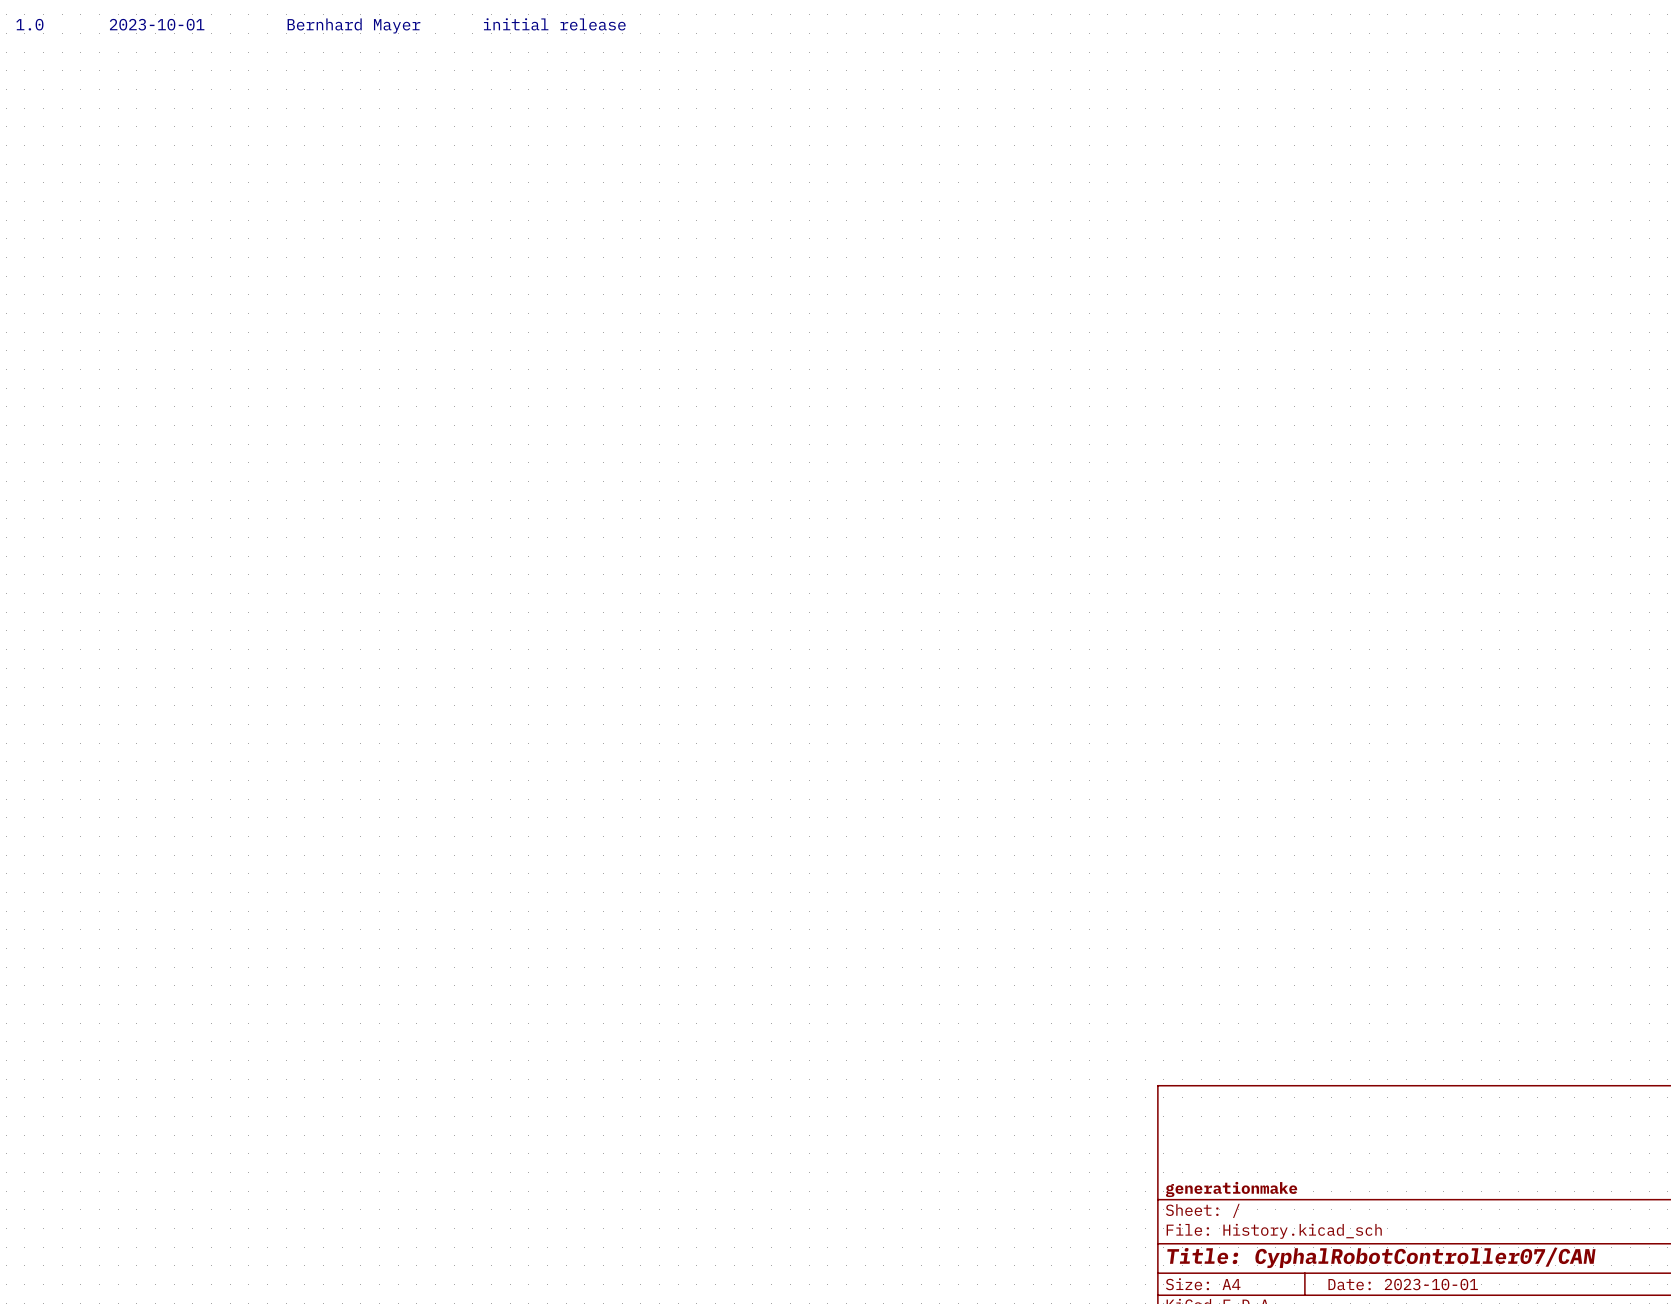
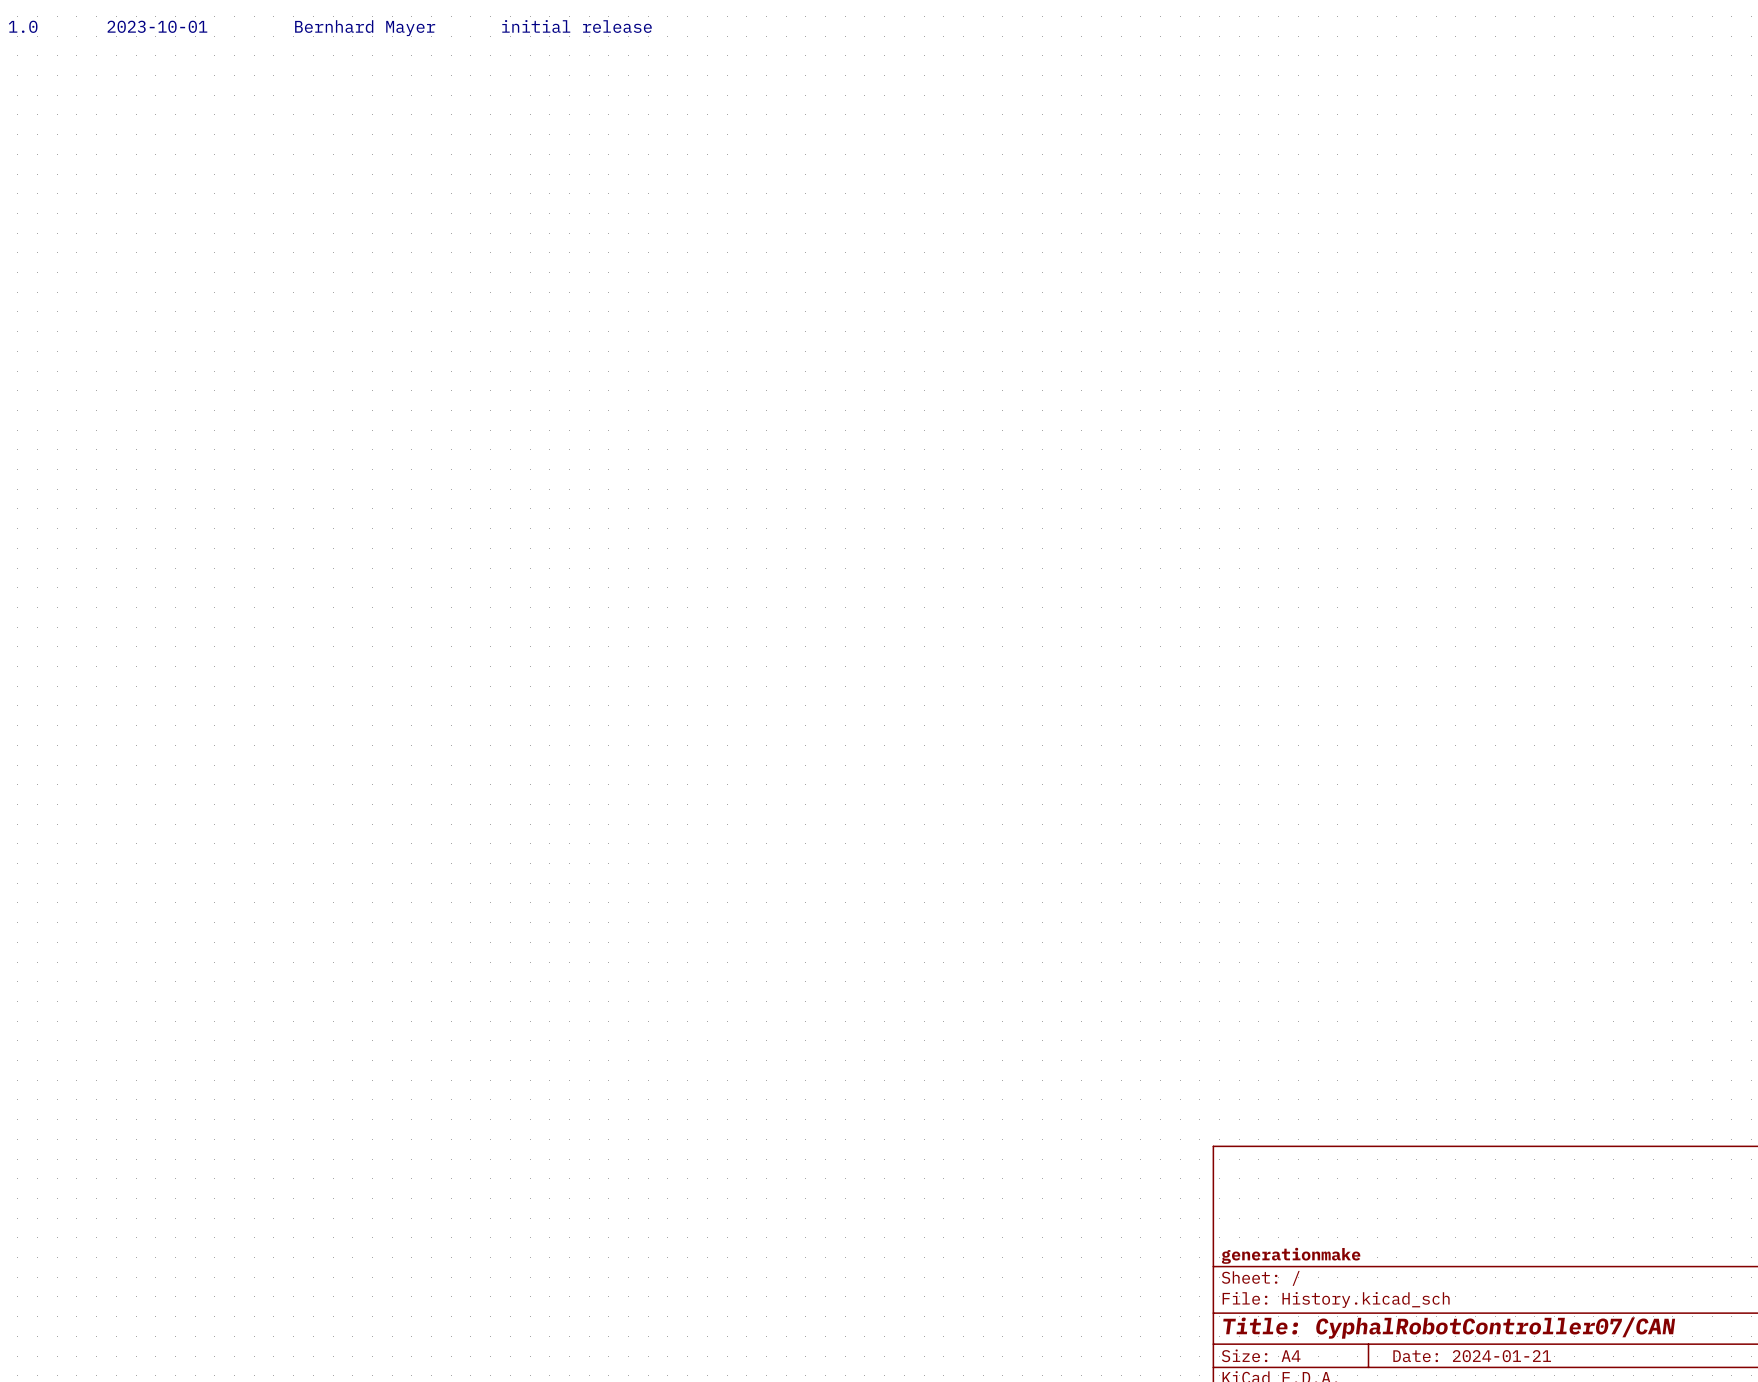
title block: Date: 2023-10-01 (1403, 1284) -> Date: 2024-01-21 (1472, 1356)

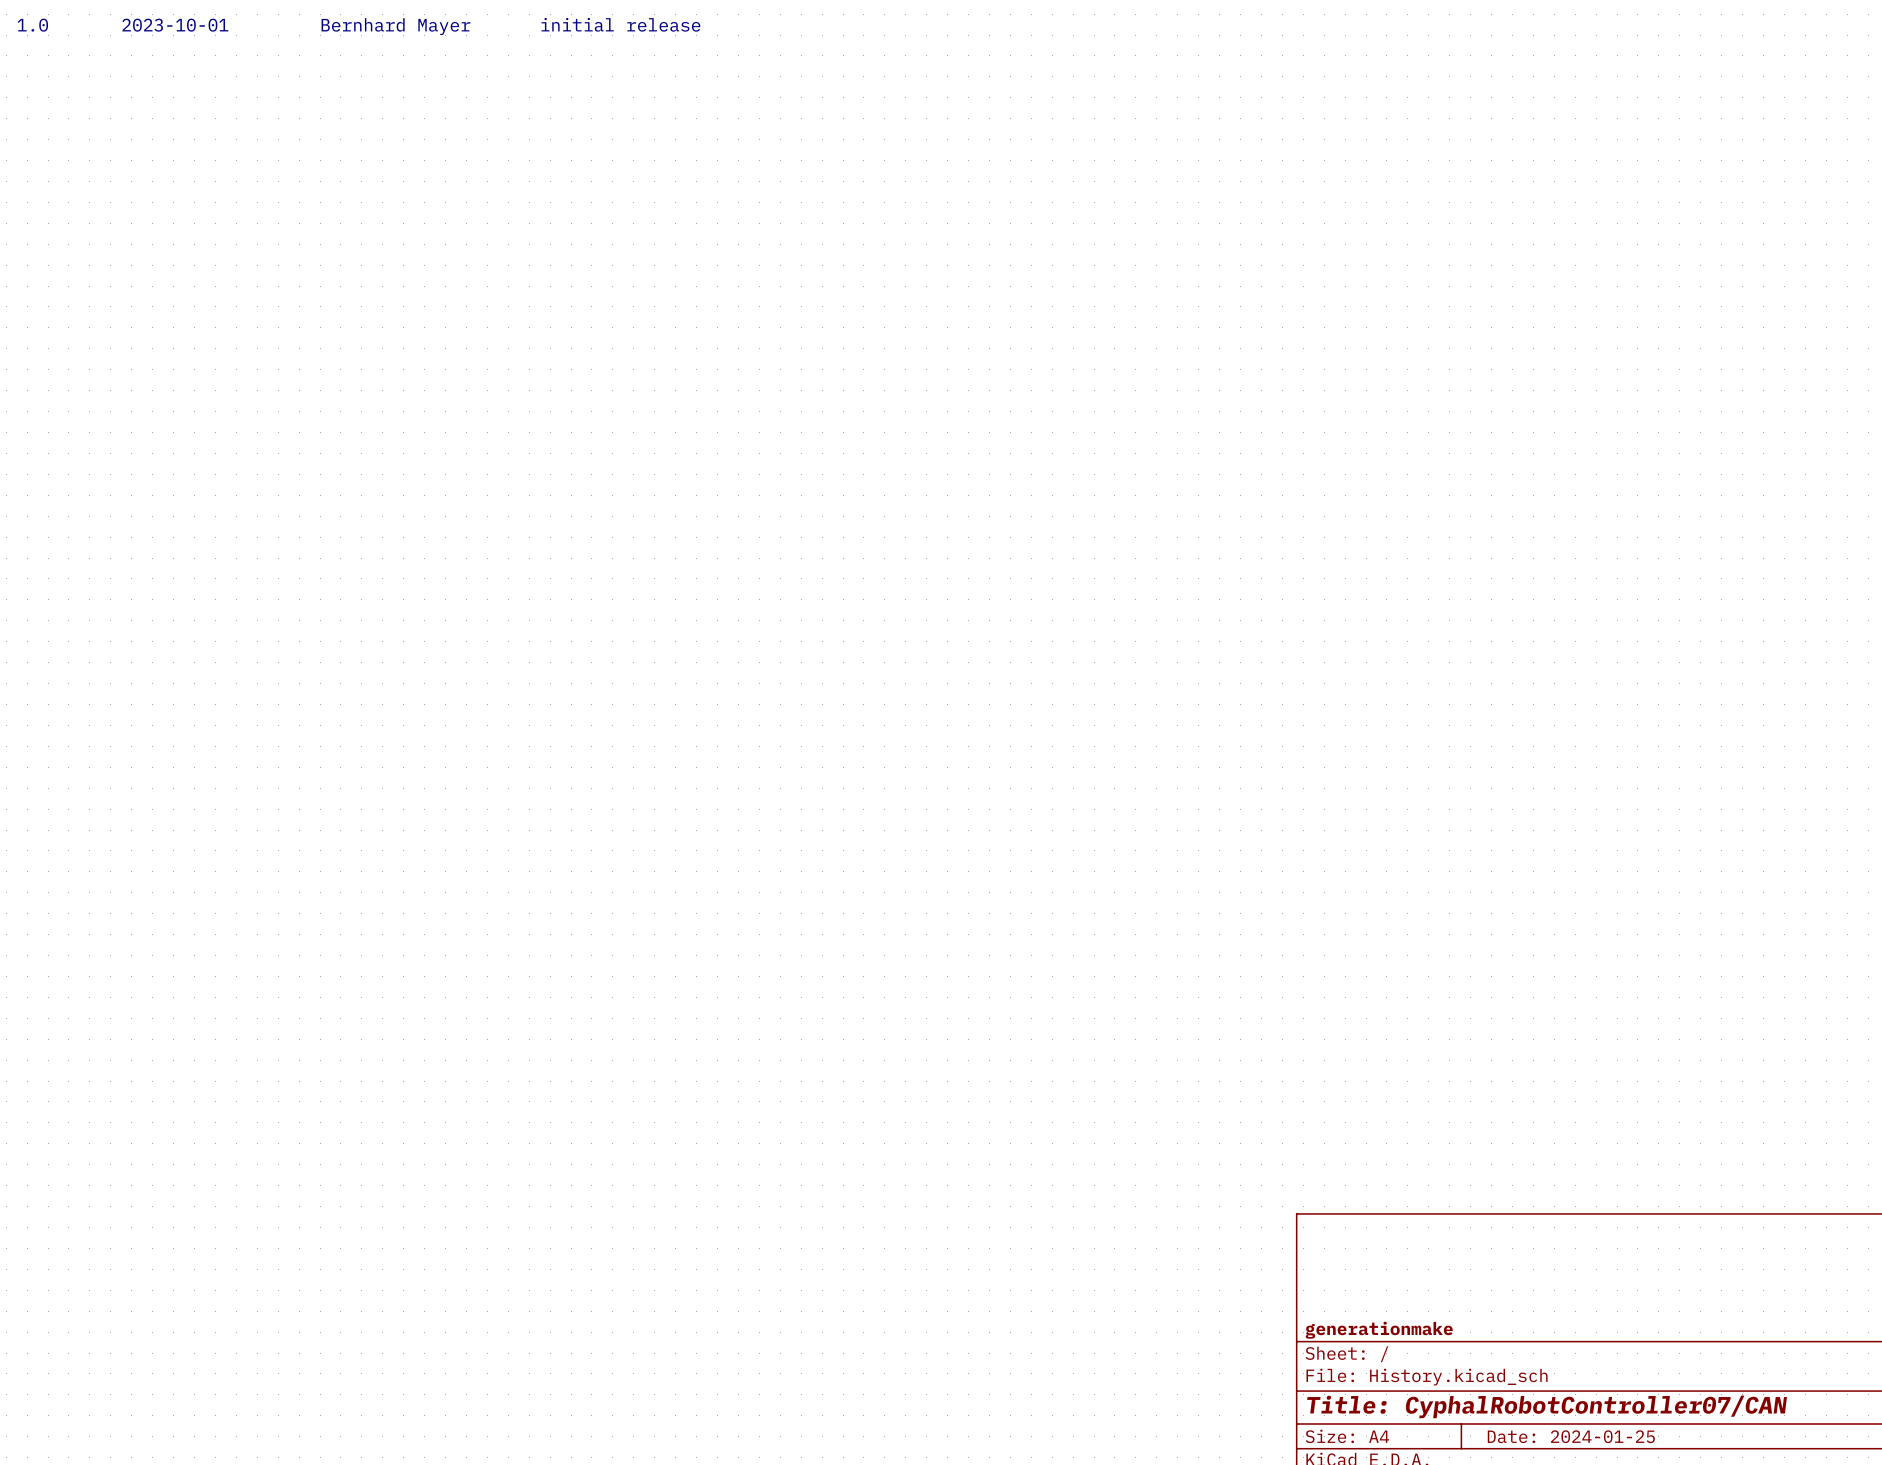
title block: Date: 2024-01-21 (1472, 1356) -> Date: 2024-01-25 (1571, 1436)

